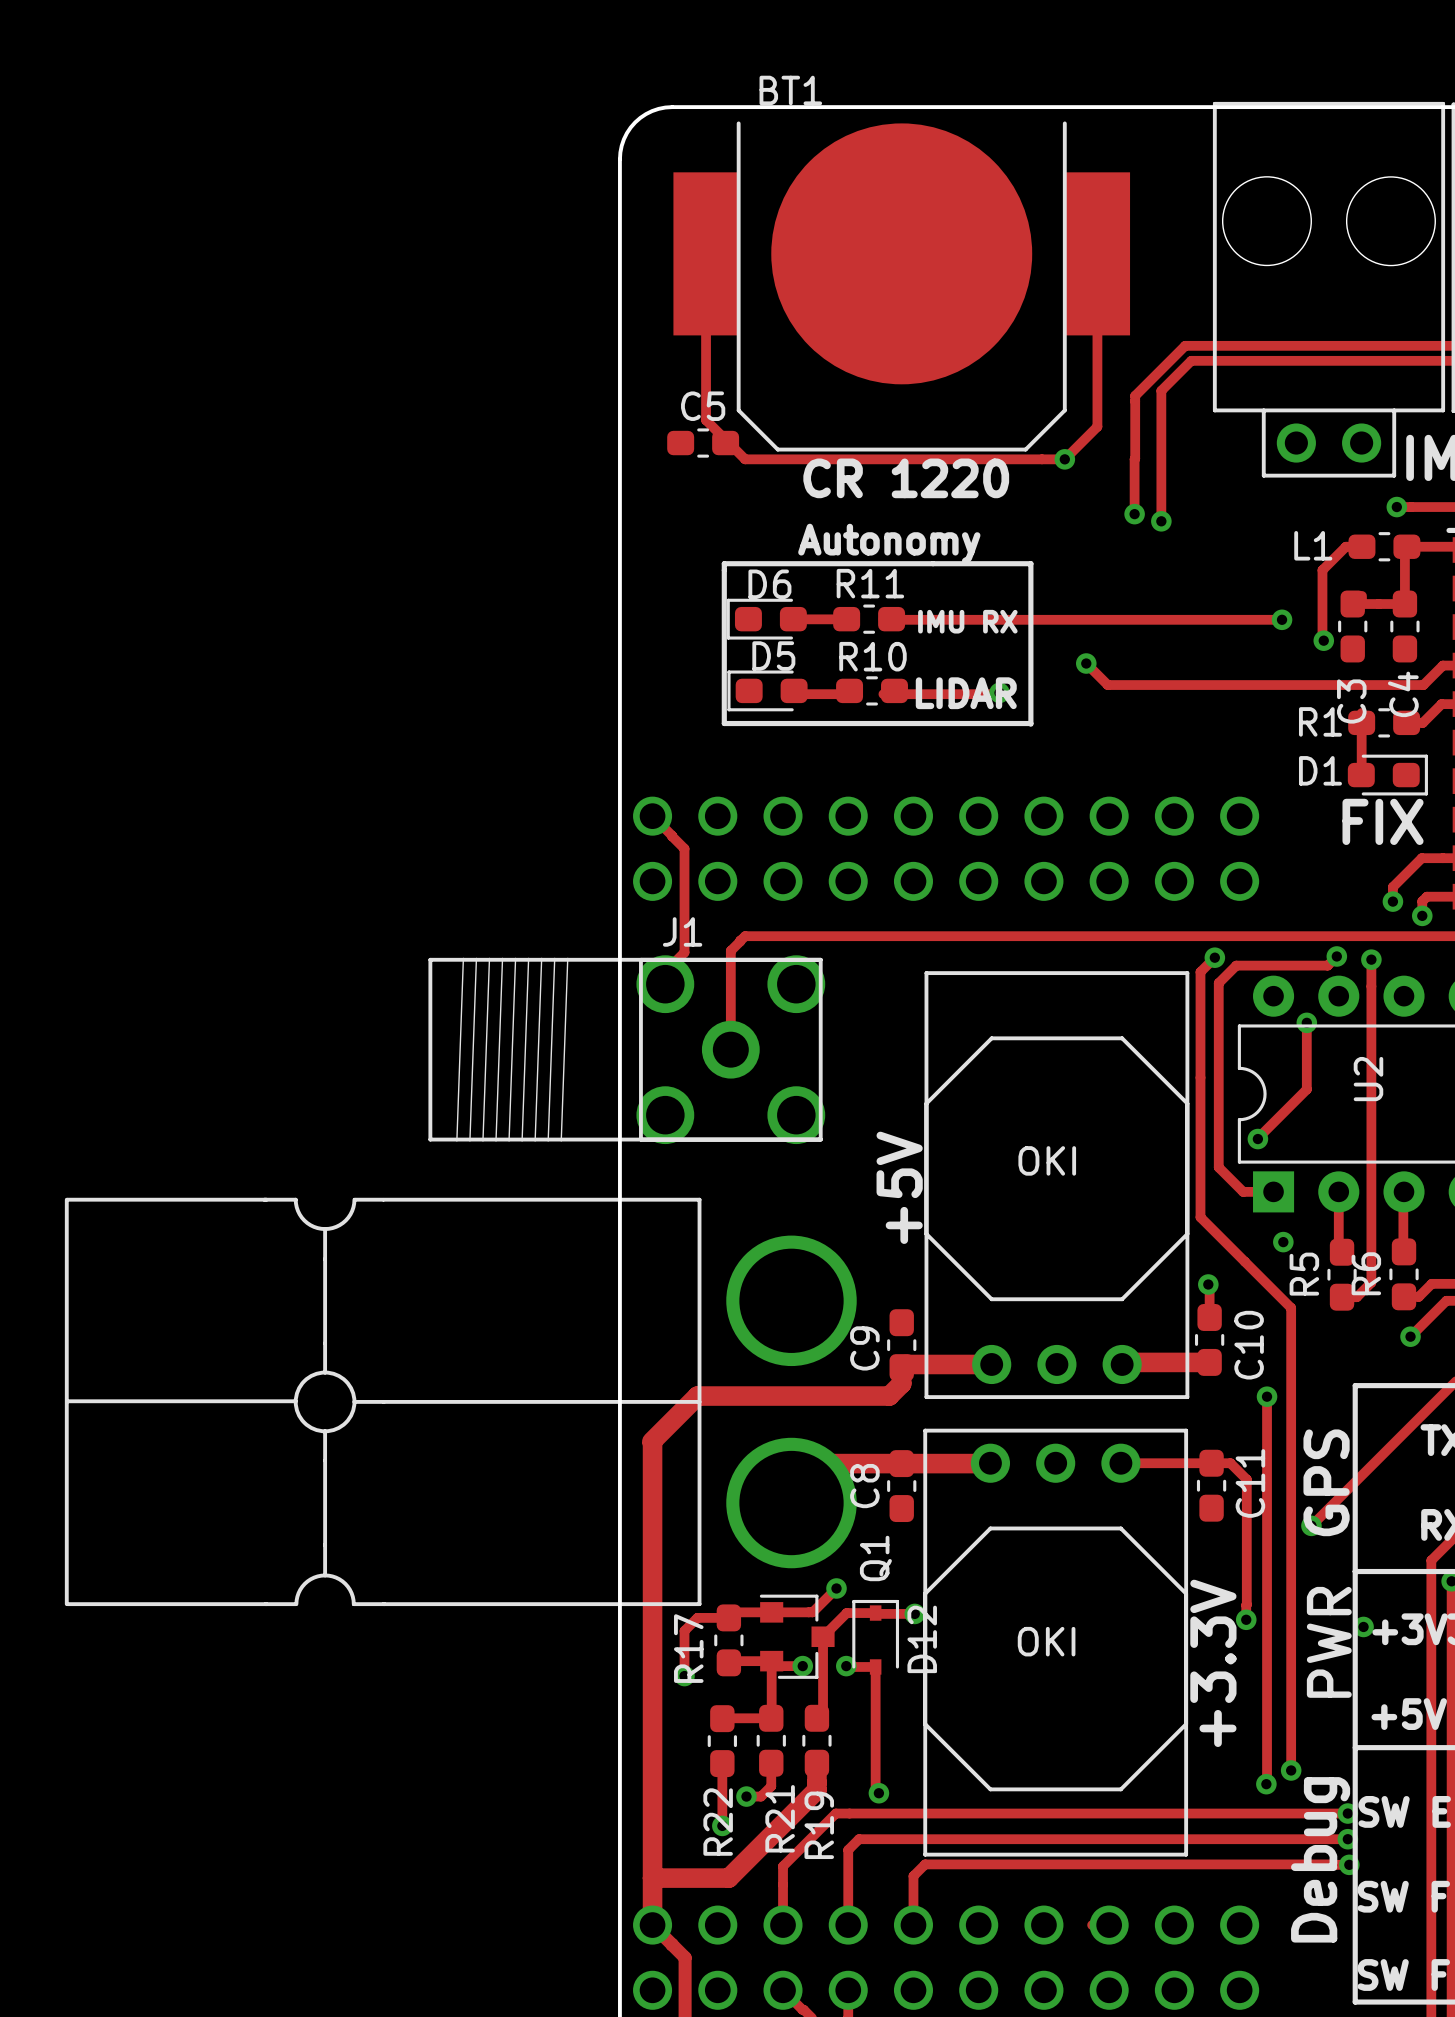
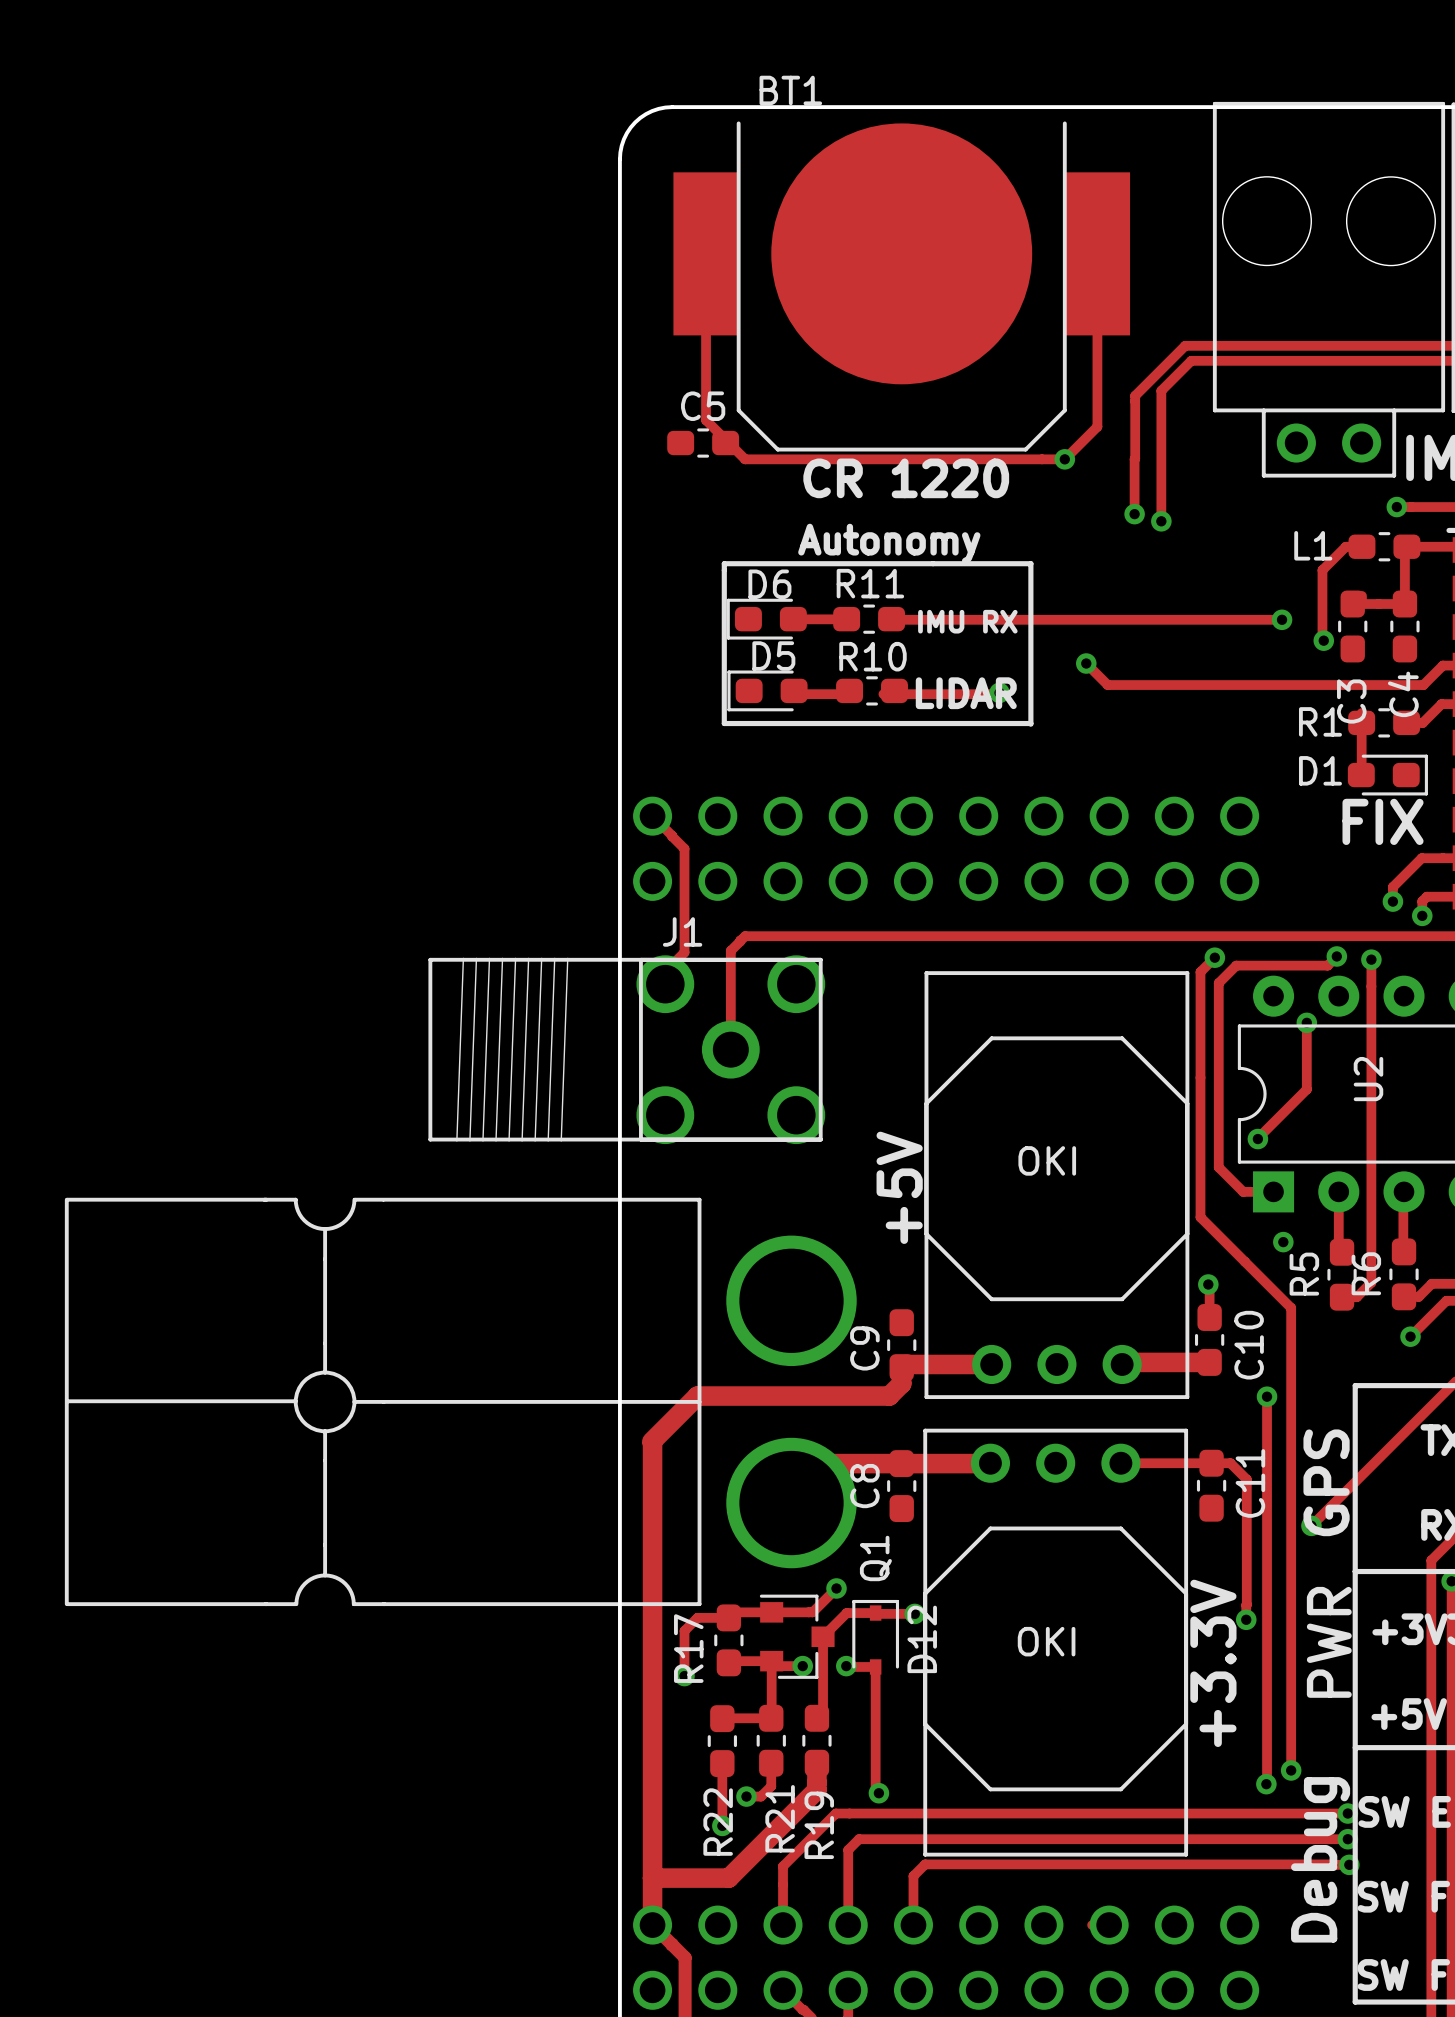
via: (1363, 1626) -> none

